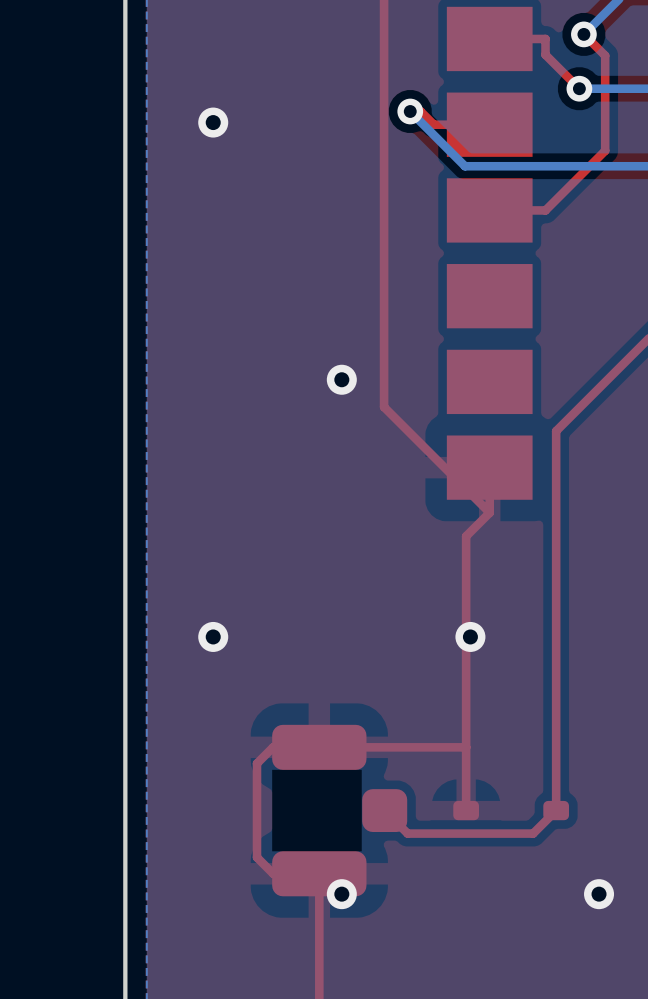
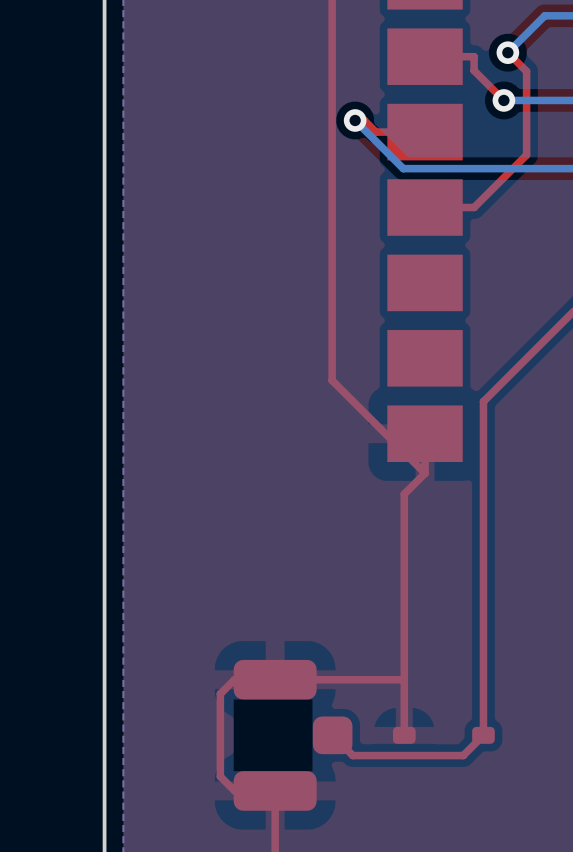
via: (213, 122) -> none
via: (341, 379) -> none
via: (213, 636) -> none
via: (470, 636) -> none
via: (341, 894) -> none
via: (599, 894) -> none

